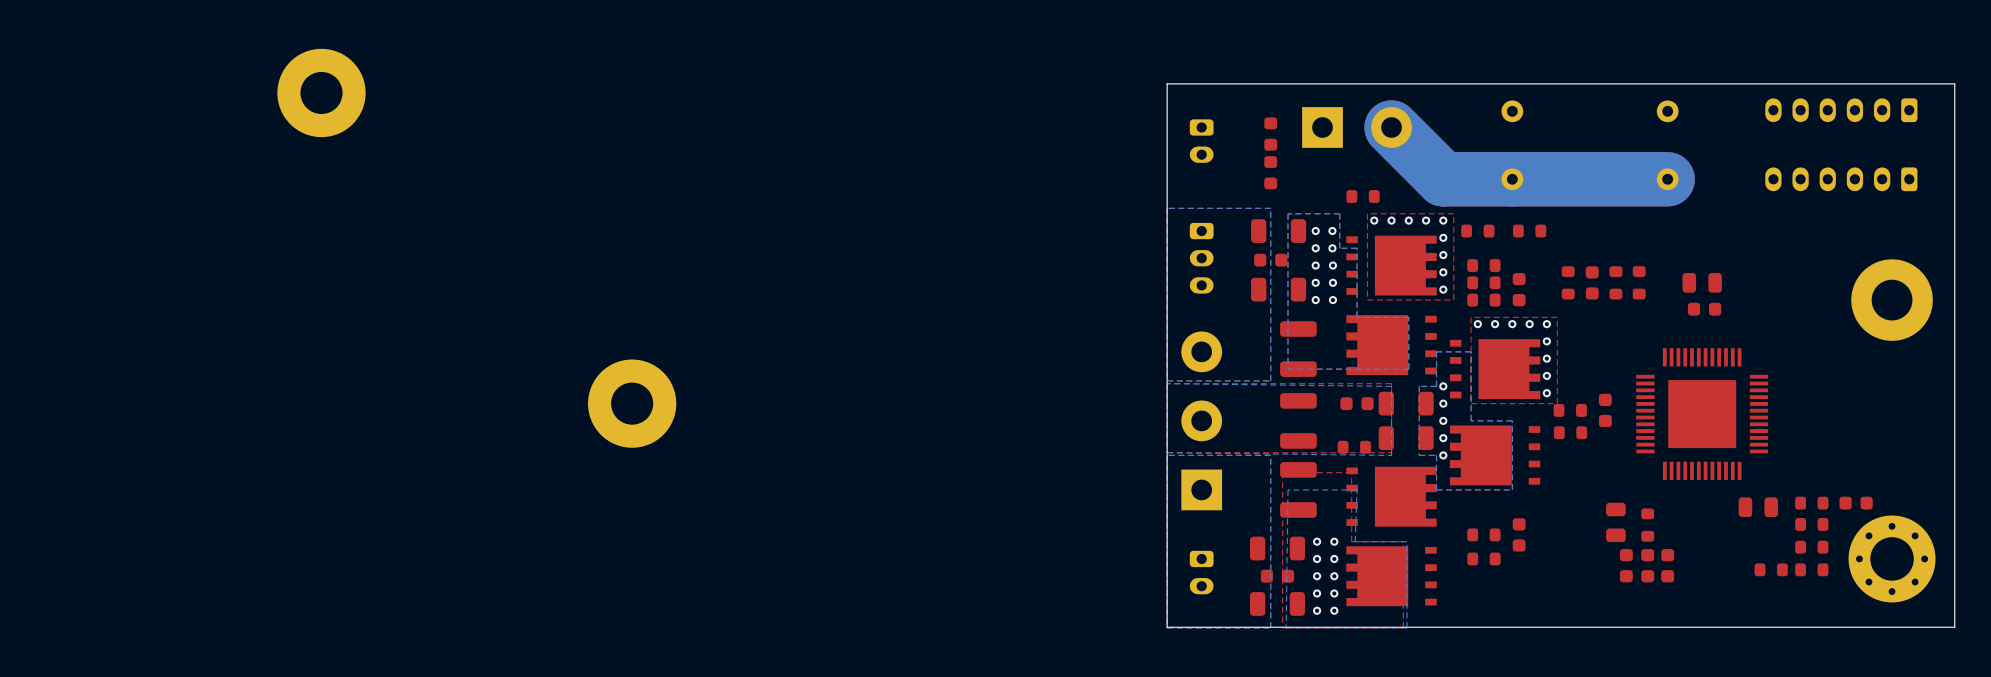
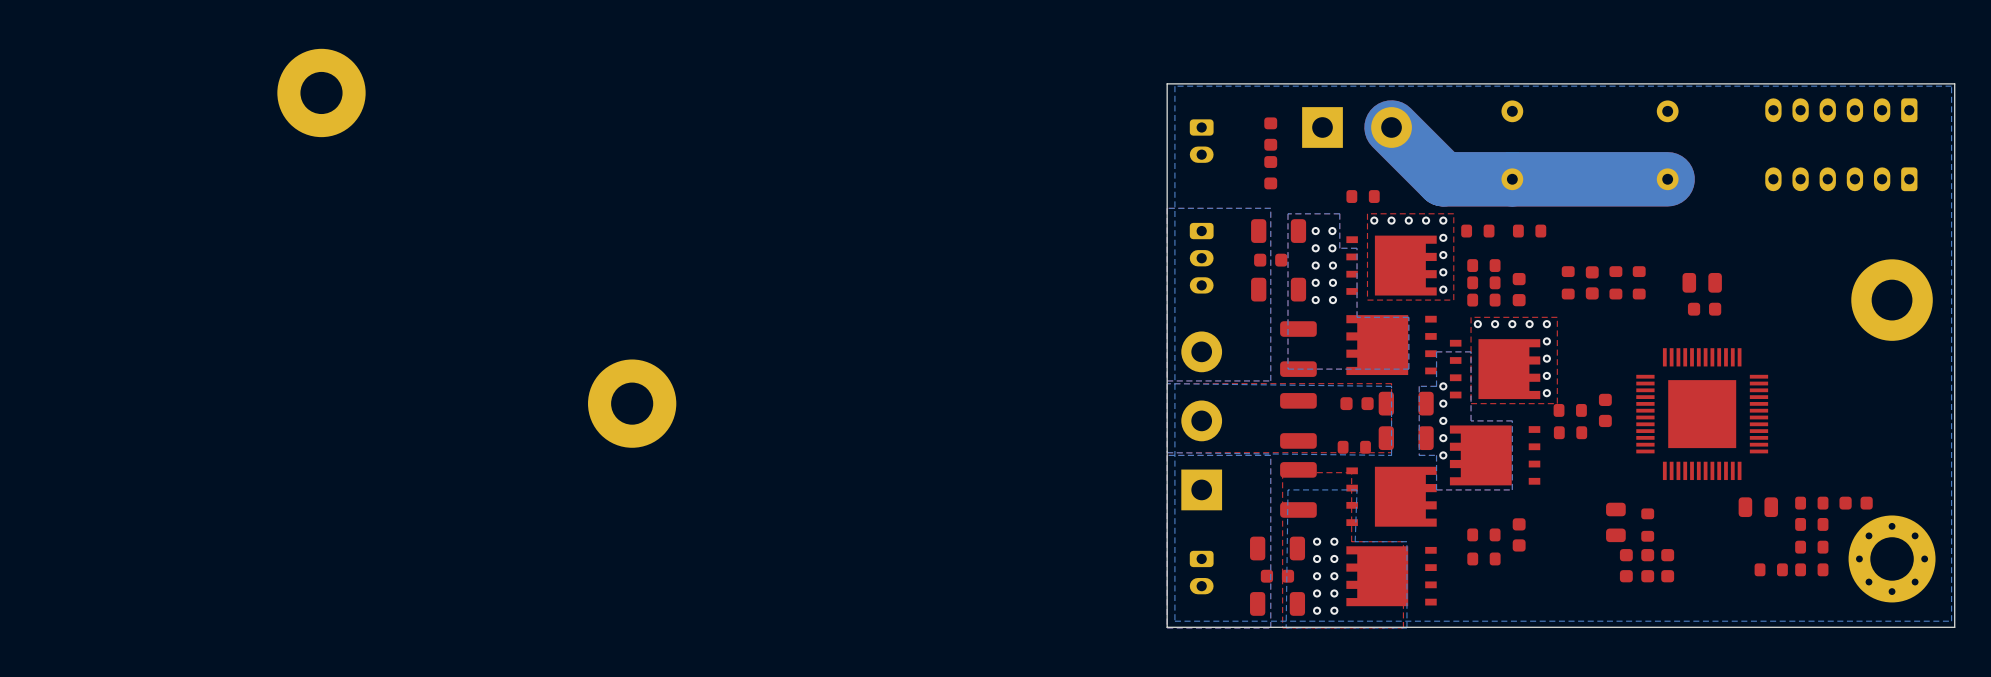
bottom zone outline: none -> (1951, 86) (1951, 621) (1174, 621) (1174, 86) (1951, 86)

